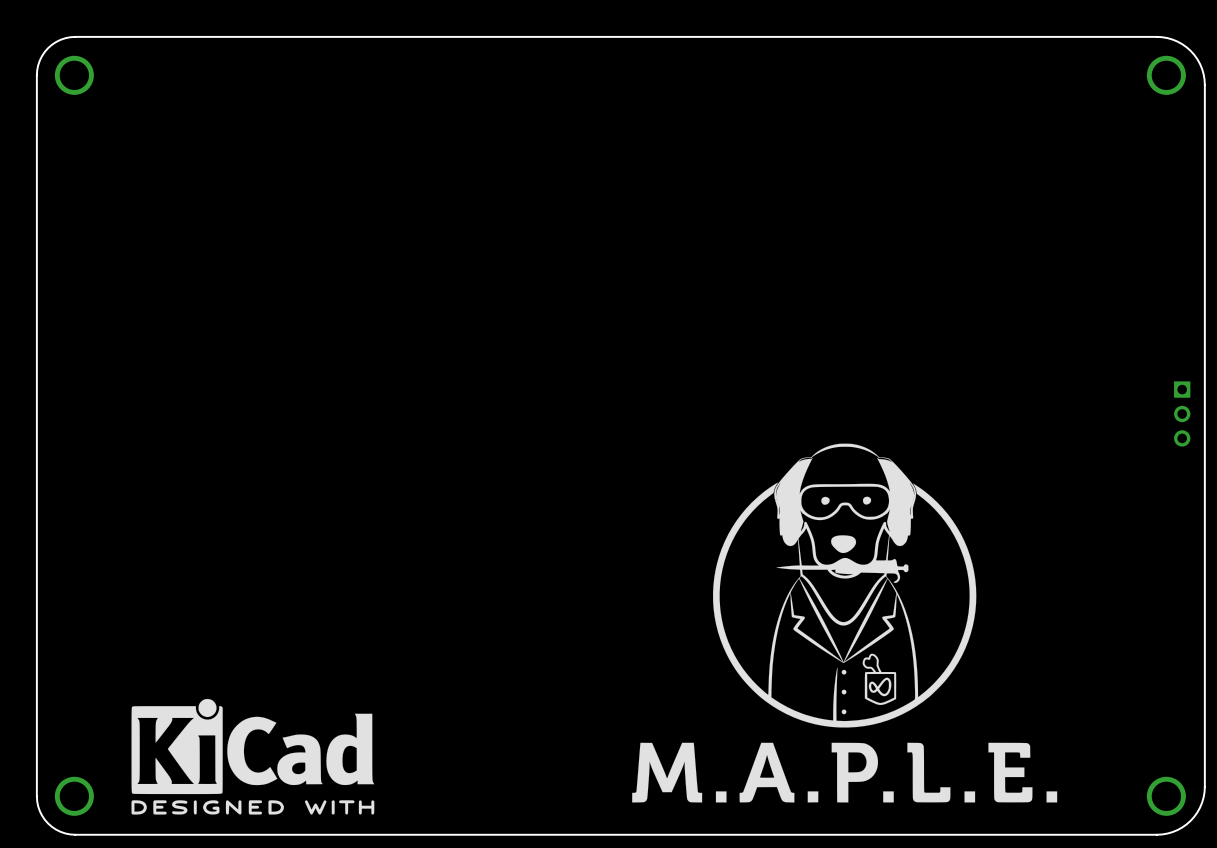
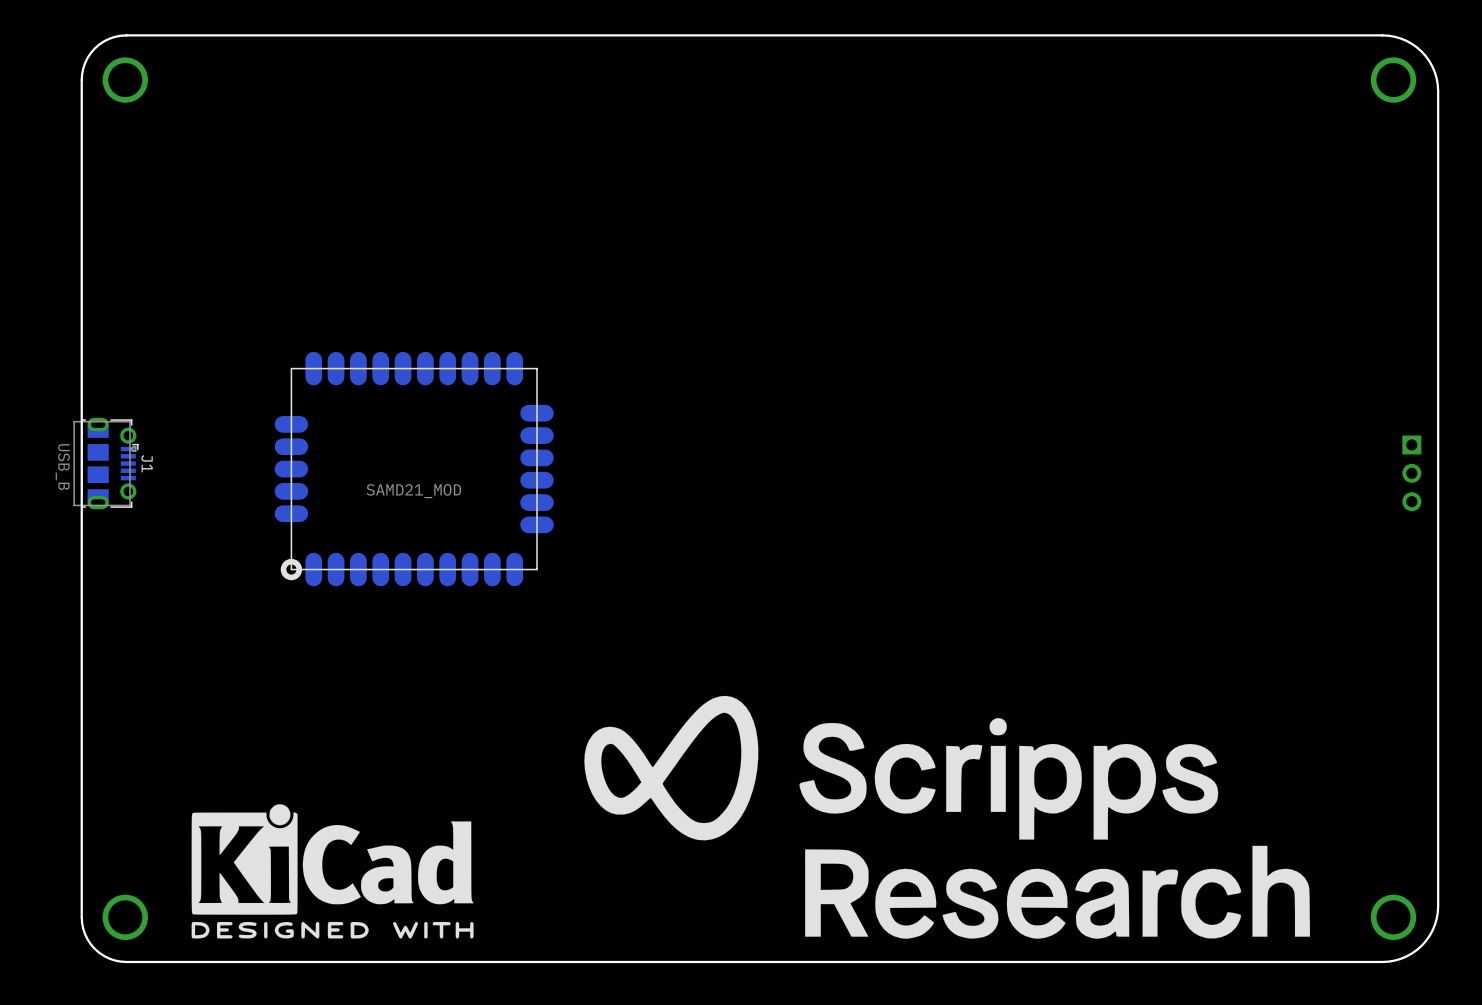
J1: none -> USB_B (106, 463)
part: none -> SAMD21_MOD (414, 469)
drawing: [632, 443, 1058, 803] -> none
drawing: none -> [584, 695, 1311, 939]

